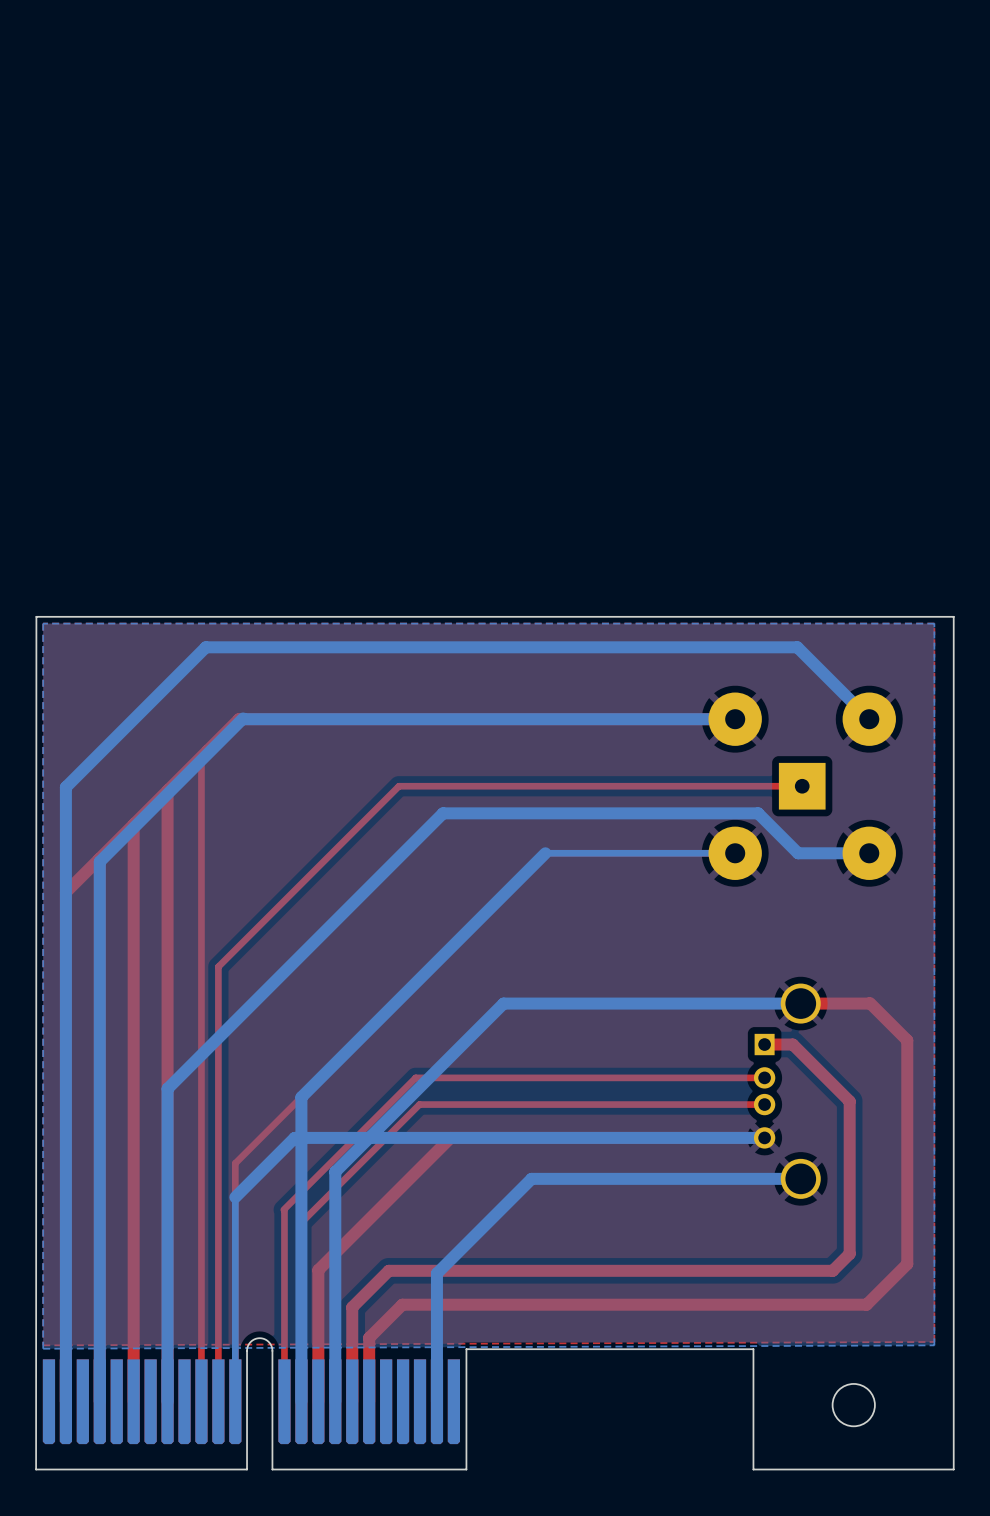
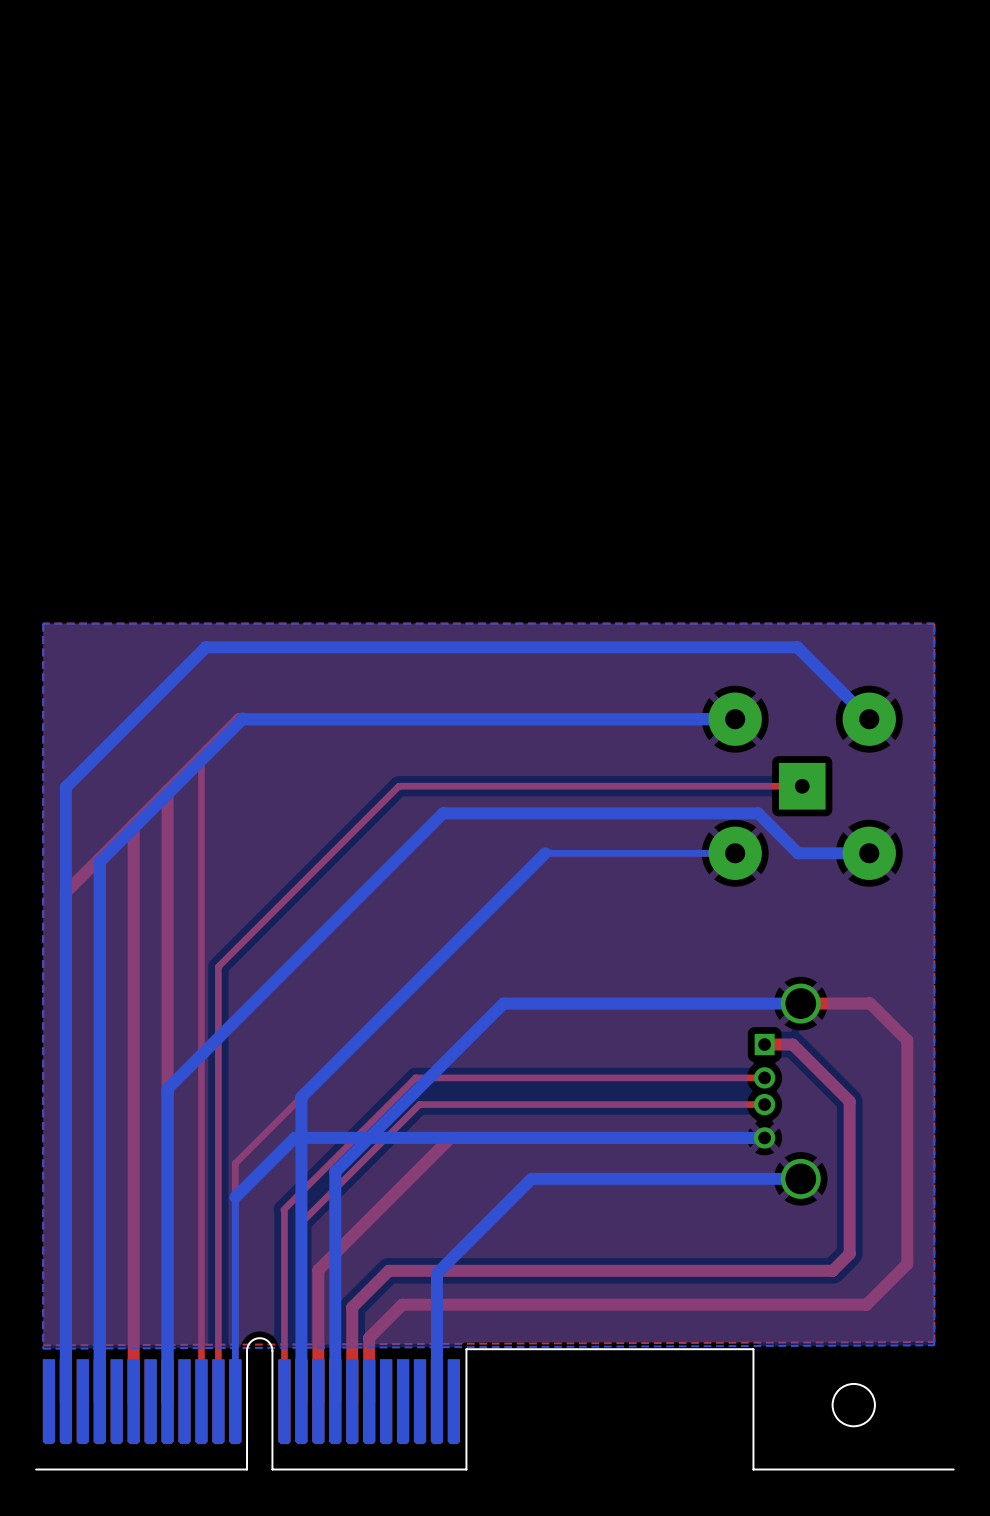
board edge: (953, 1469) (953, 616) (36, 616) (36, 1469) -> none

